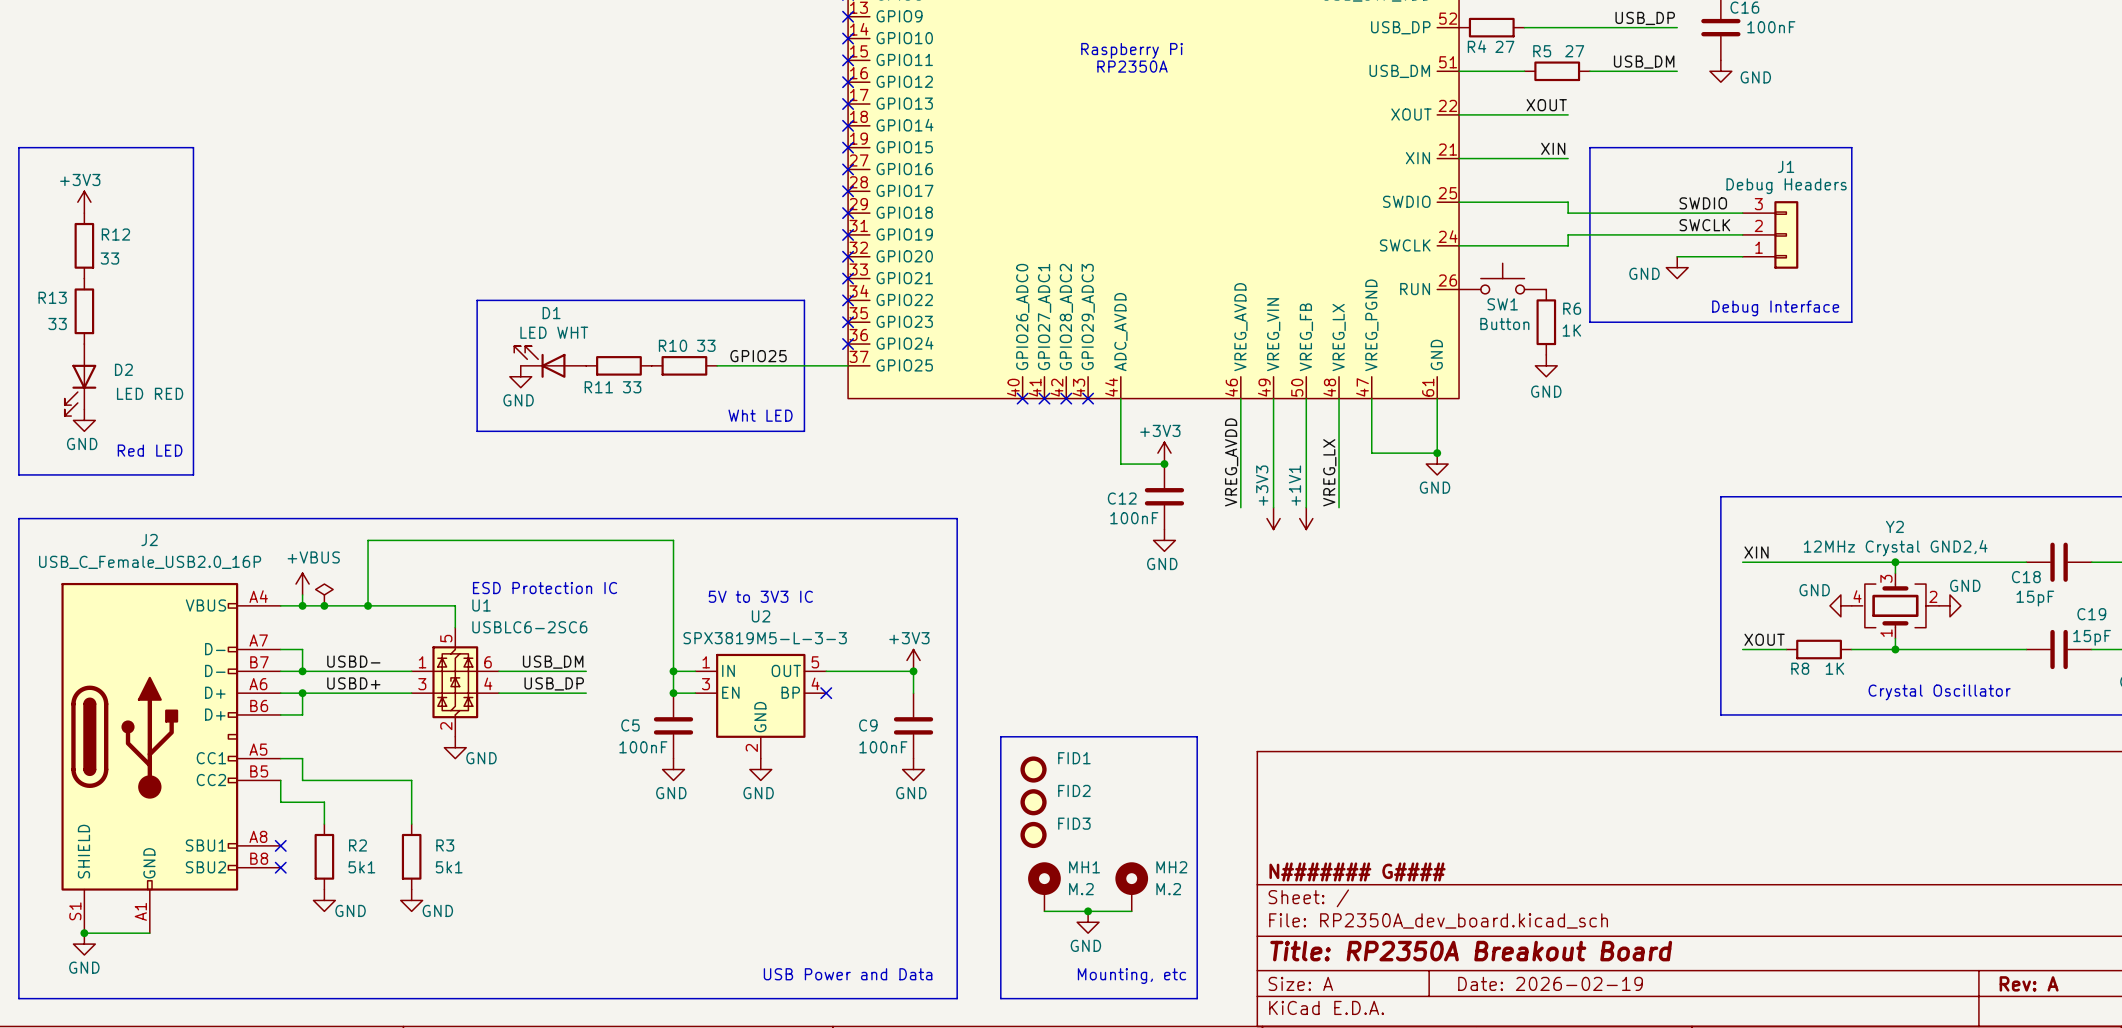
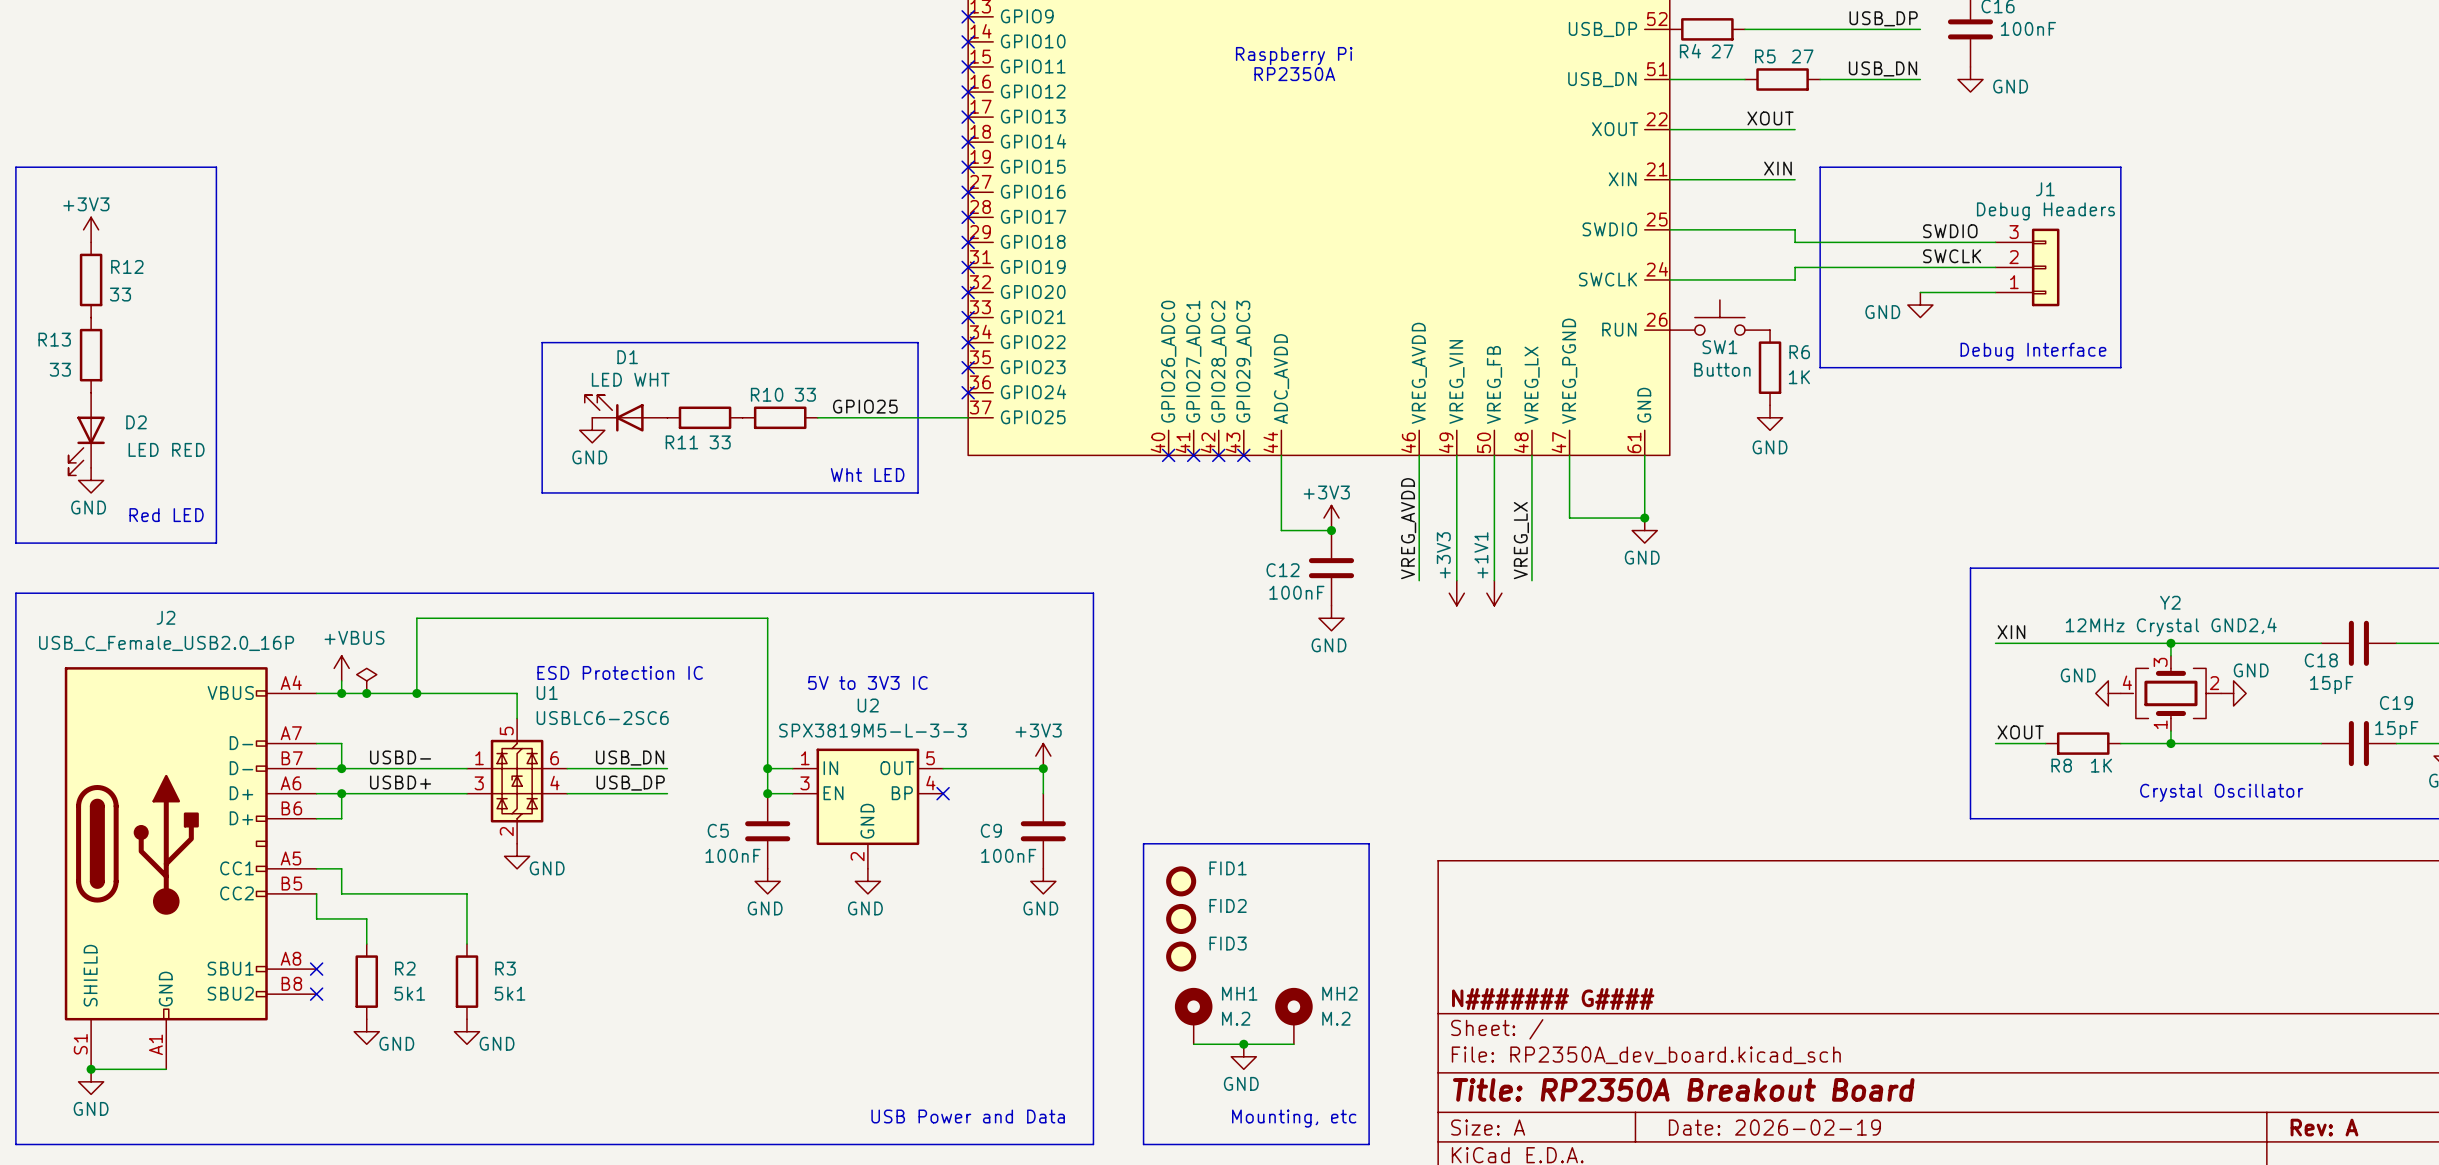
label: USB_DM (1644, 62) -> USB_DN (1882, 68)
part pin name: USB_DM (1399, 71) -> USB_DN (1602, 79)
label: USB_DM (553, 662) -> USB_DN (630, 758)

